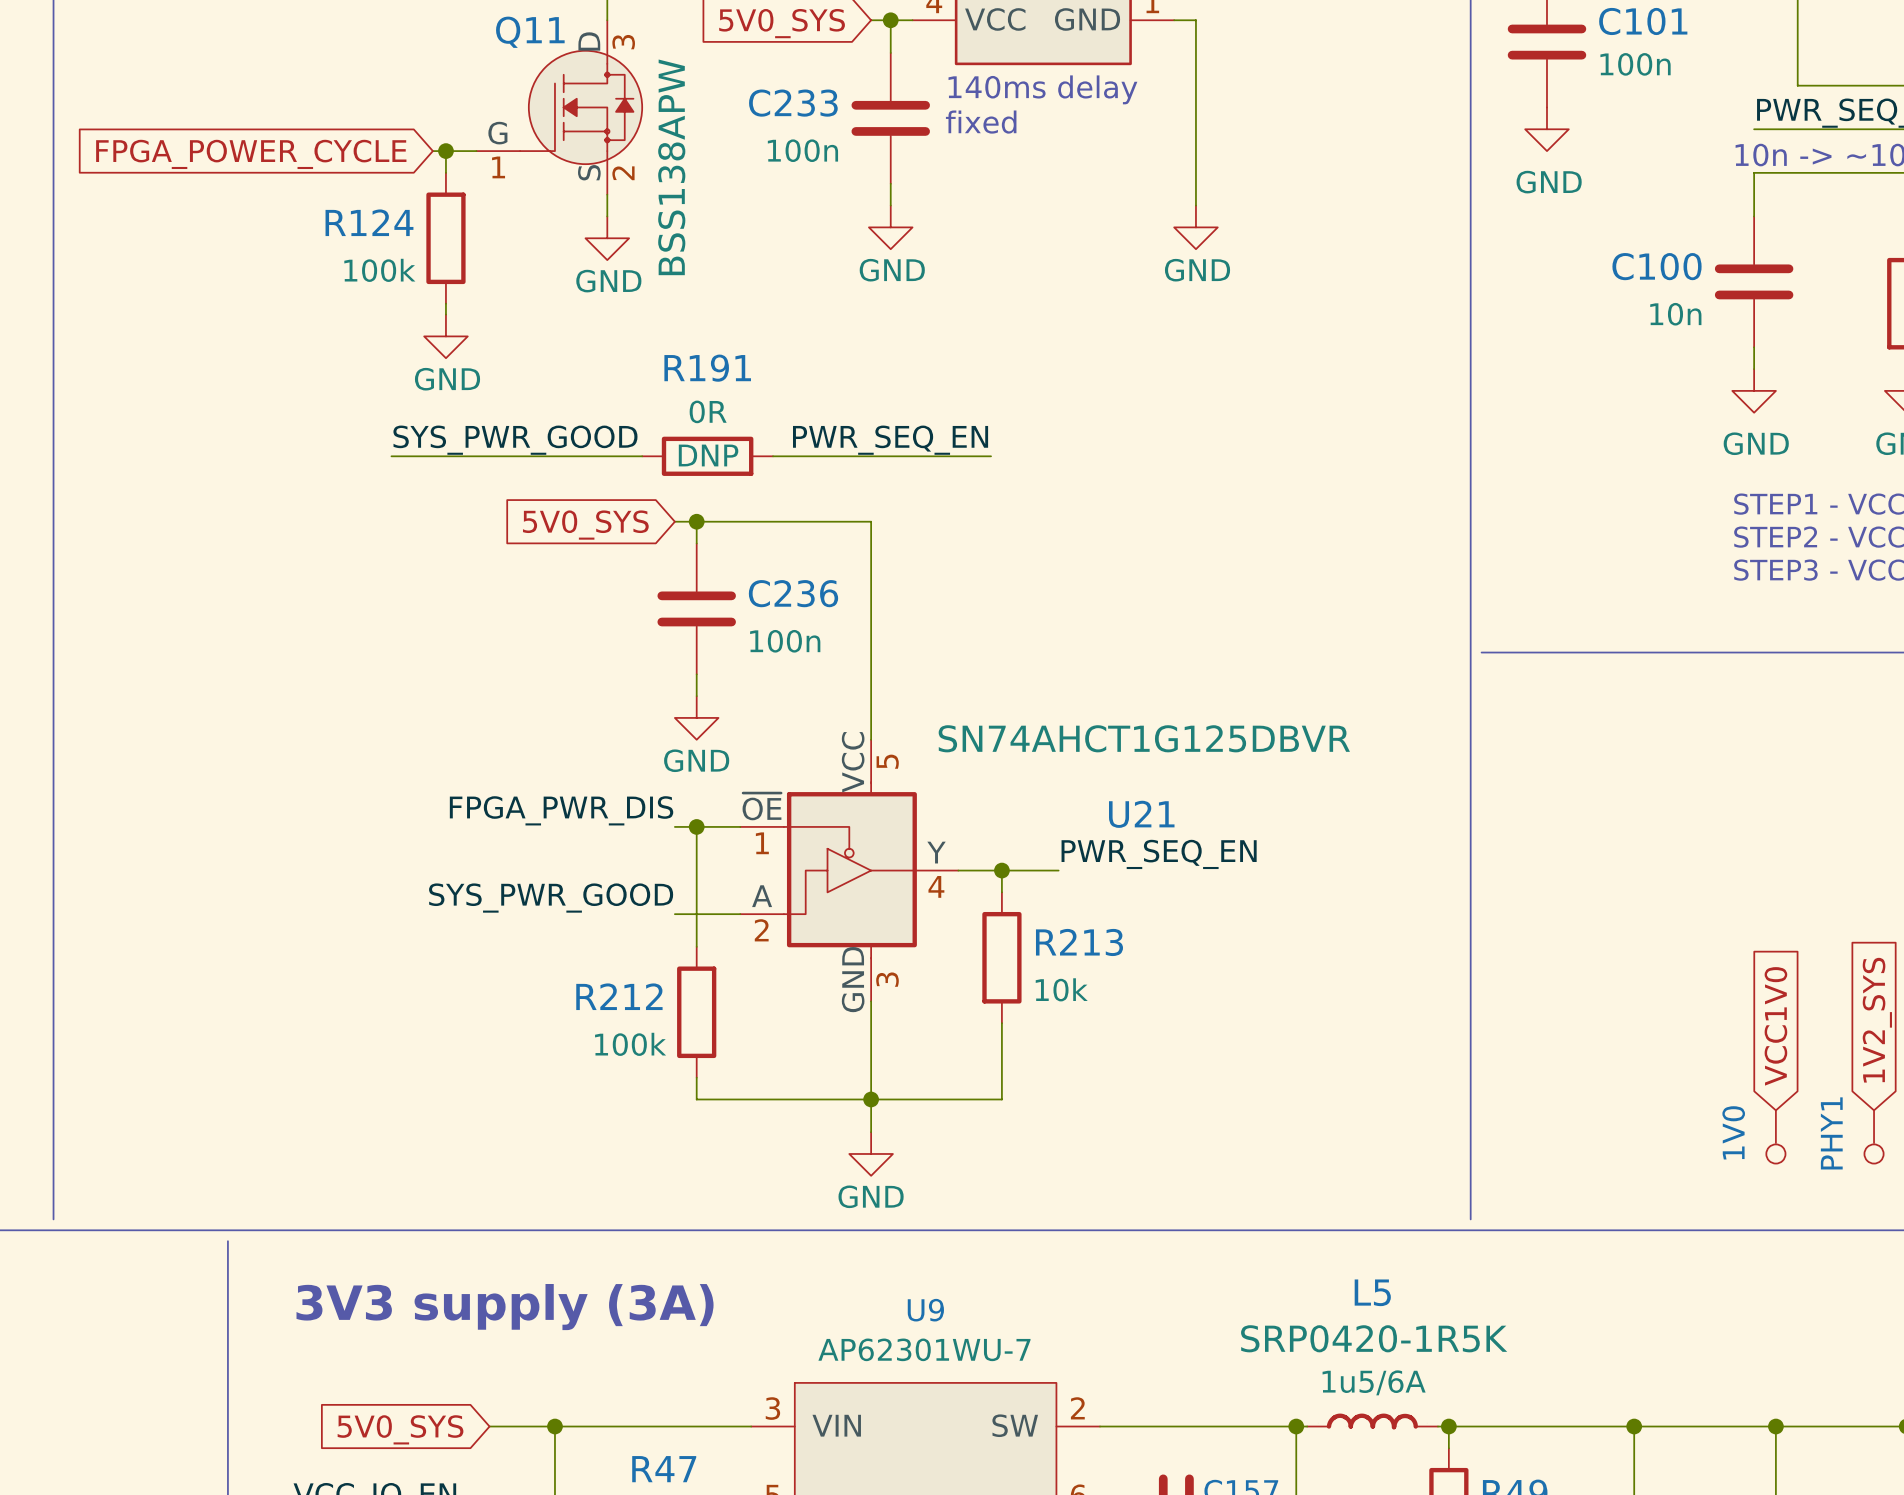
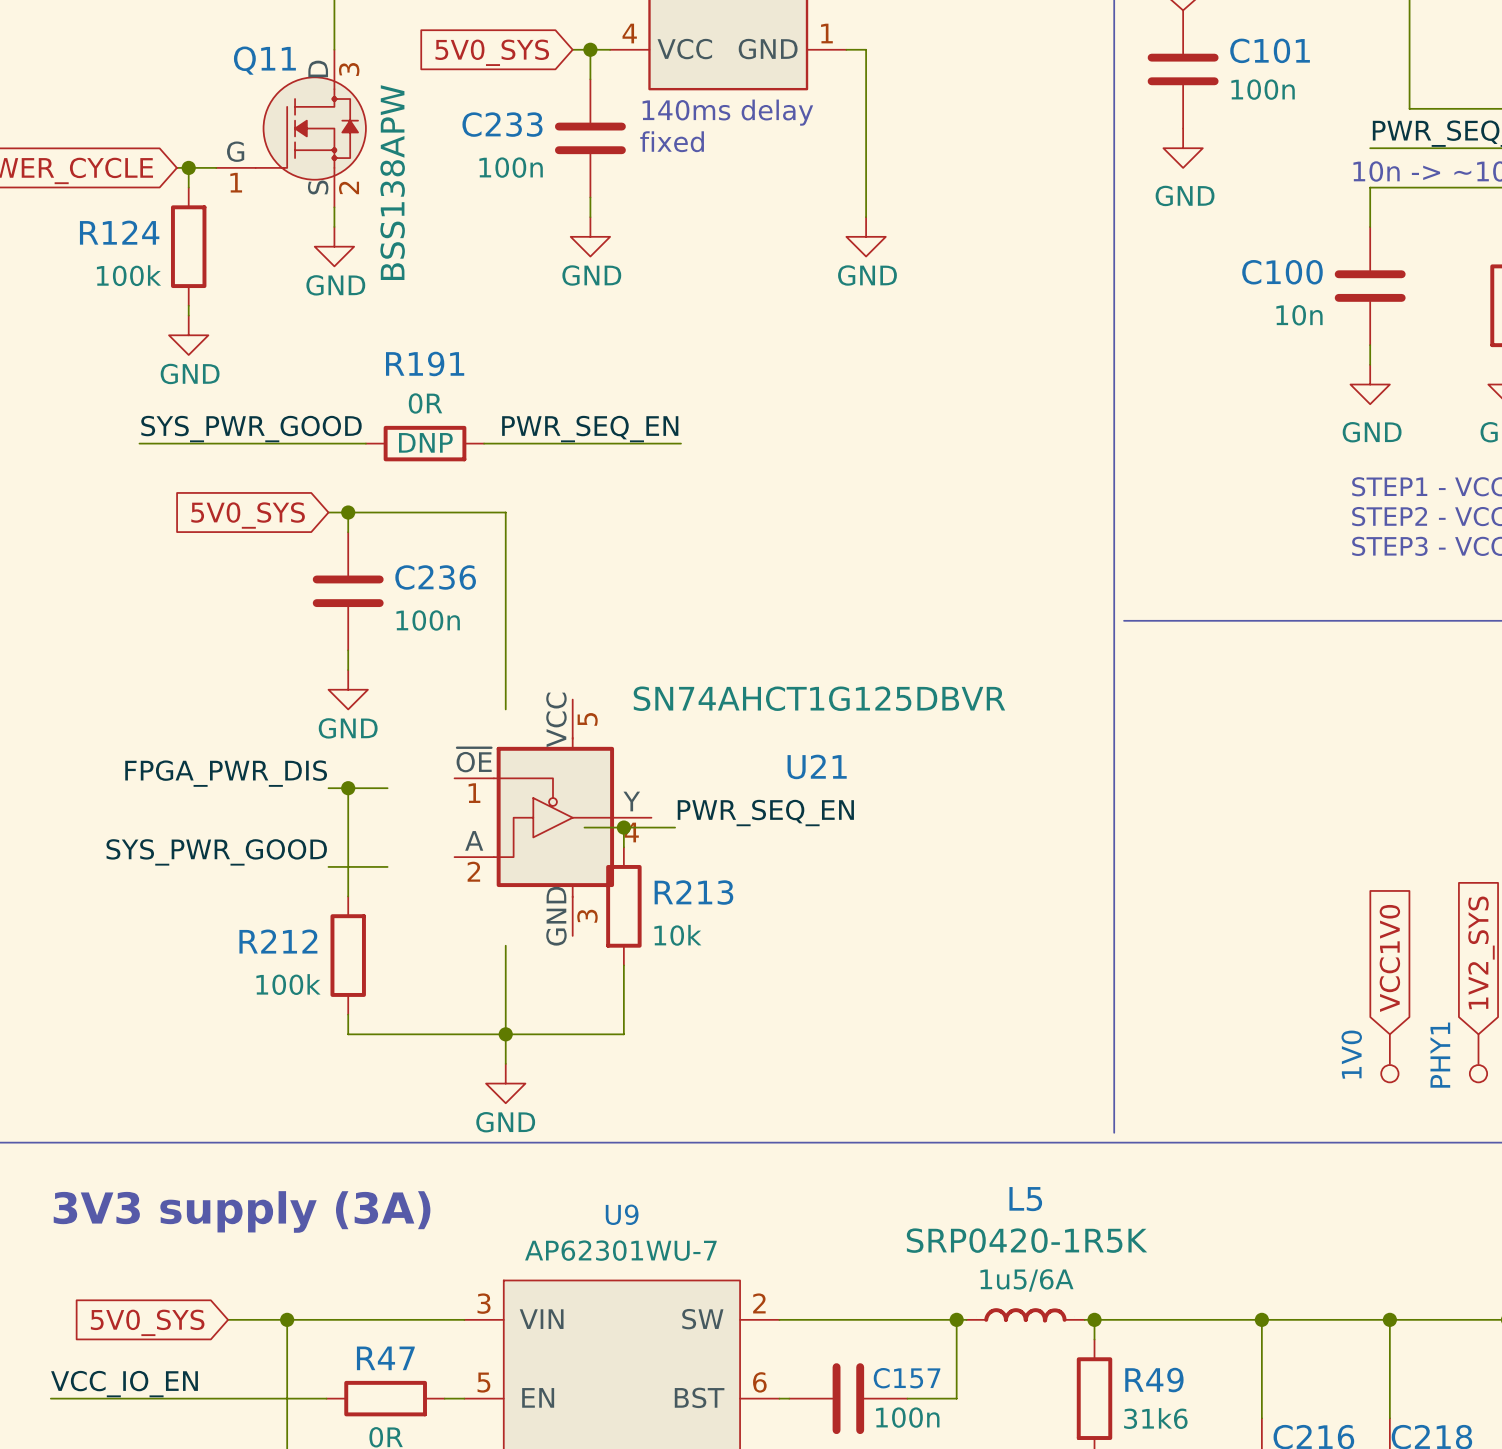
wire: (674, 521) (871, 521) (871, 739) -> (328, 512) (505, 512) (505, 709)
wire: (696, 521) (696, 543) -> (348, 512) (348, 532)
junction position: (696, 521) -> (348, 512)
global label position: 5V0_SYS (585, 525) -> 5V0_SYS (248, 515)
C236 position: (696, 608) -> (348, 591)
wire: (696, 674) (696, 696) -> (348, 650) (348, 670)
power symbol position: GND (696, 717) -> GND (348, 689)
label position: FPGA_PWR_DIS (561, 810) -> FPGA_PWR_DIS (226, 773)
wire: (674, 826) (740, 826) -> (328, 788) (387, 788)
wire: (696, 826) (696, 946) -> (348, 788) (348, 896)
junction position: (696, 826) -> (348, 788)
label position: PWR_SEQ_EN (1159, 854) -> PWR_SEQ_EN (765, 813)
wire: (958, 870) (1058, 870) -> (584, 827) (675, 827)
wire: (1001, 870) (1001, 892) -> (623, 827) (623, 847)
junction position: (1001, 870) -> (623, 827)
label position: SYS_PWR_GOOD (551, 898) -> SYS_PWR_GOOD (216, 852)
wire: (674, 914) (740, 914) -> (328, 866) (387, 866)
R213 position: (1001, 957) -> (623, 906)
wire: (871, 1001) (871, 1132) -> (505, 945) (505, 1063)
R212 position: (696, 1012) -> (348, 955)
wire: (1001, 1023) (1001, 1099) (696, 1099) (696, 1077) -> (623, 965) (623, 1034) (348, 1034) (348, 1014)
junction position: (871, 1099) -> (505, 1034)
power symbol position: GND (871, 1153) -> GND (505, 1083)

